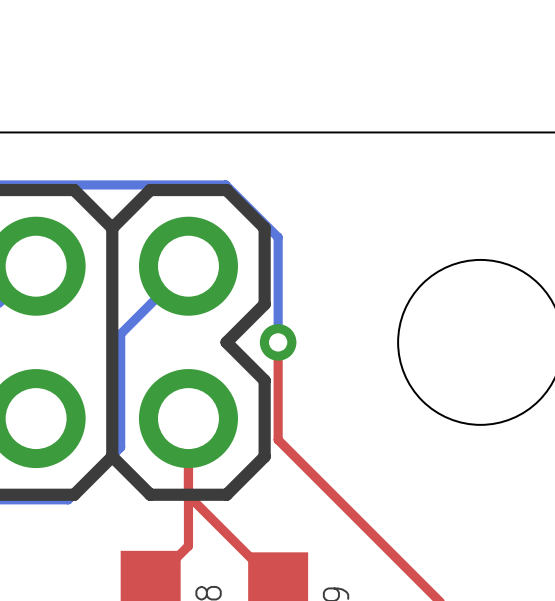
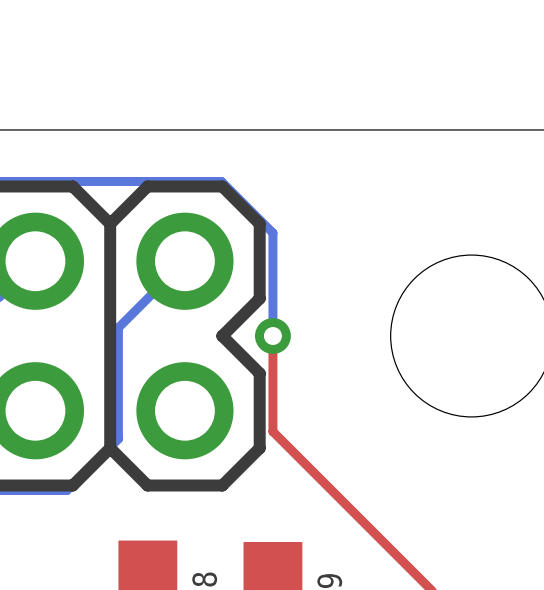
top track: (188, 418) (188, 546) (150, 583) -> none
top track: (188, 495) (278, 585) -> none

